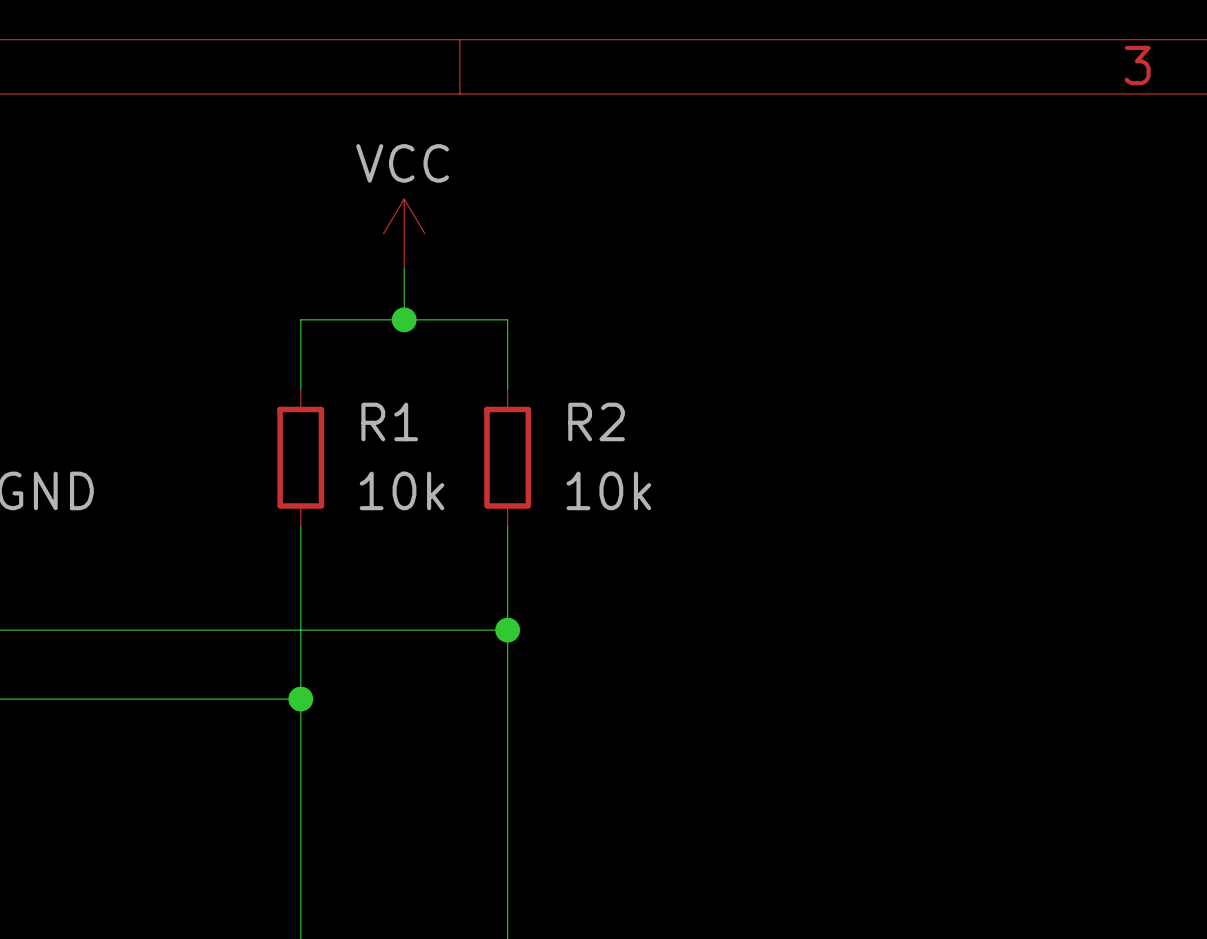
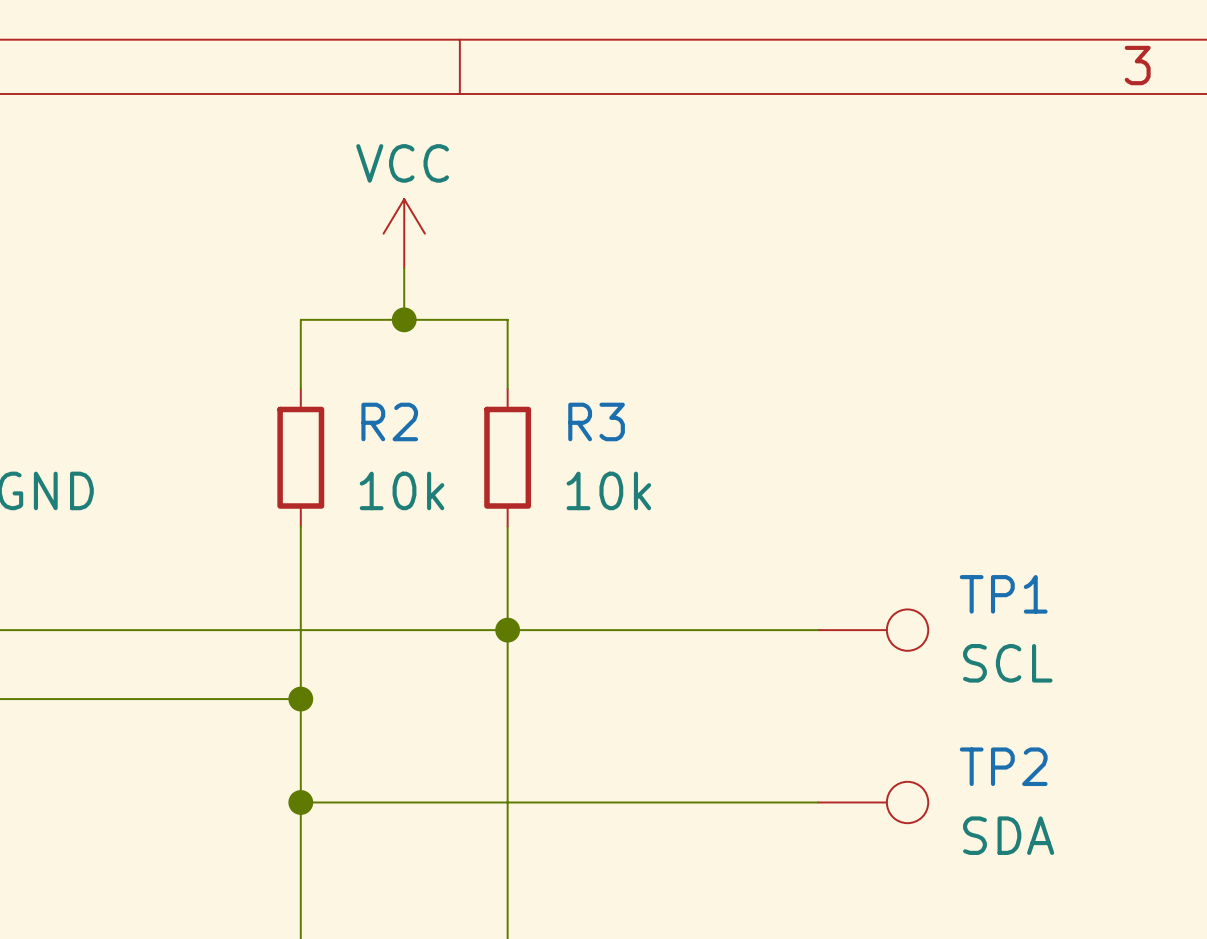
R1 name: R1 (389, 421) -> R2 (389, 421)
R2 name: R2 (596, 421) -> R3 (596, 421)
wire: none -> (507, 630) (817, 630)
TP1: none -> SCL (873, 630)
wire: none -> (300, 802) (817, 802)
junction: none -> (300, 802)
TP2: none -> SDA (873, 802)

